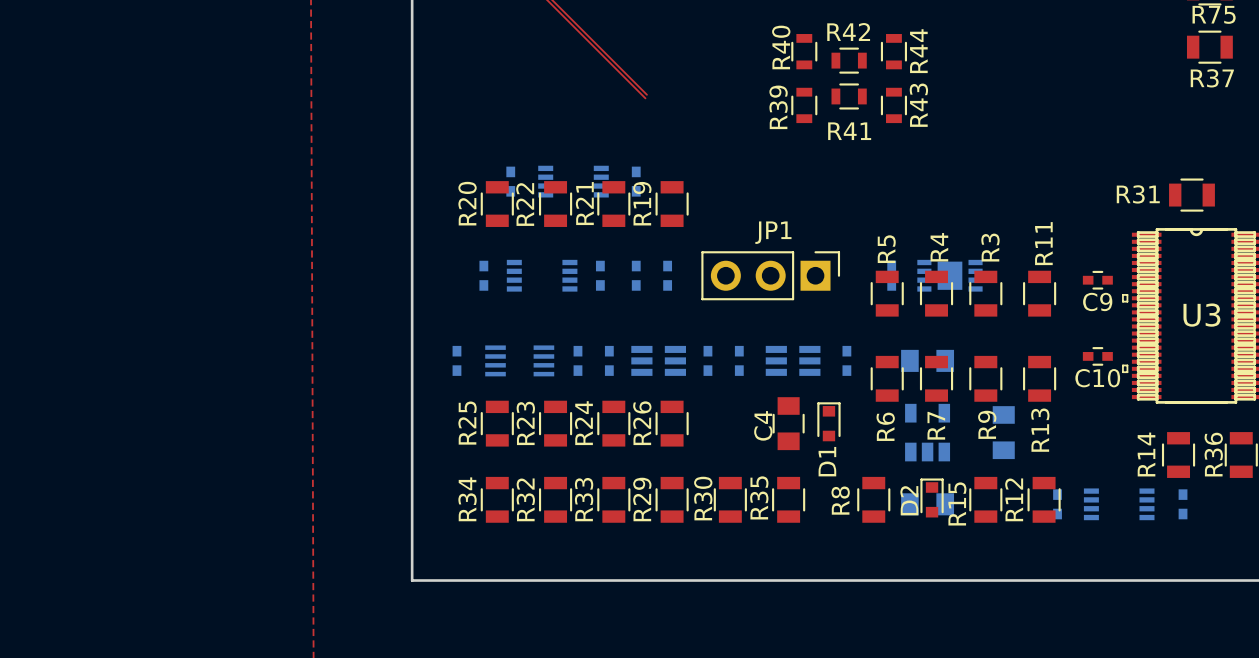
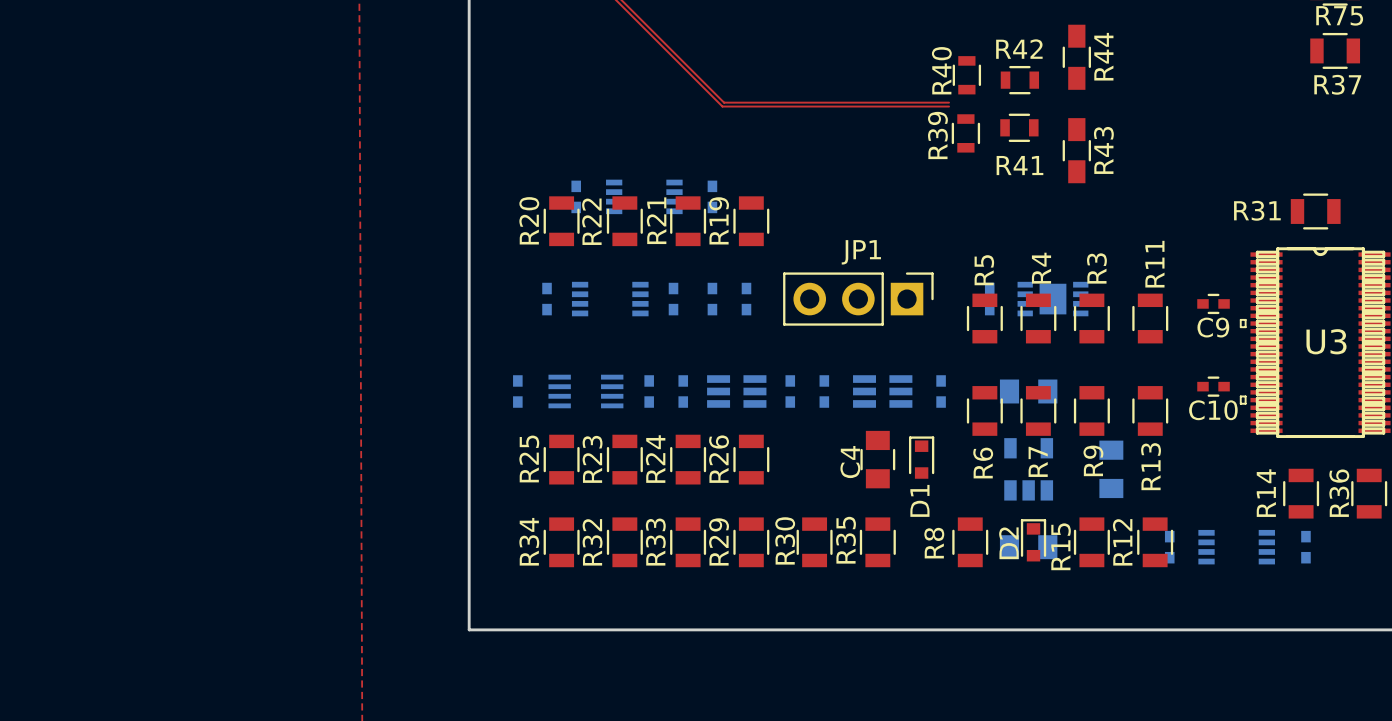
R44 footprint: [880, 34, 908, 70] -> [1062, 24, 1091, 90]
R40 position: (804, 51) -> (966, 75)
R42 position: (849, 60) -> (1019, 80)
R43 footprint: [880, 87, 908, 124] -> [1062, 118, 1091, 184]
top track: none -> (724, 102) (949, 102)
R41 position: (849, 96) -> (1019, 127)
top track: none -> (722, 106) (949, 106)
R39 position: (804, 105) -> (965, 133)

